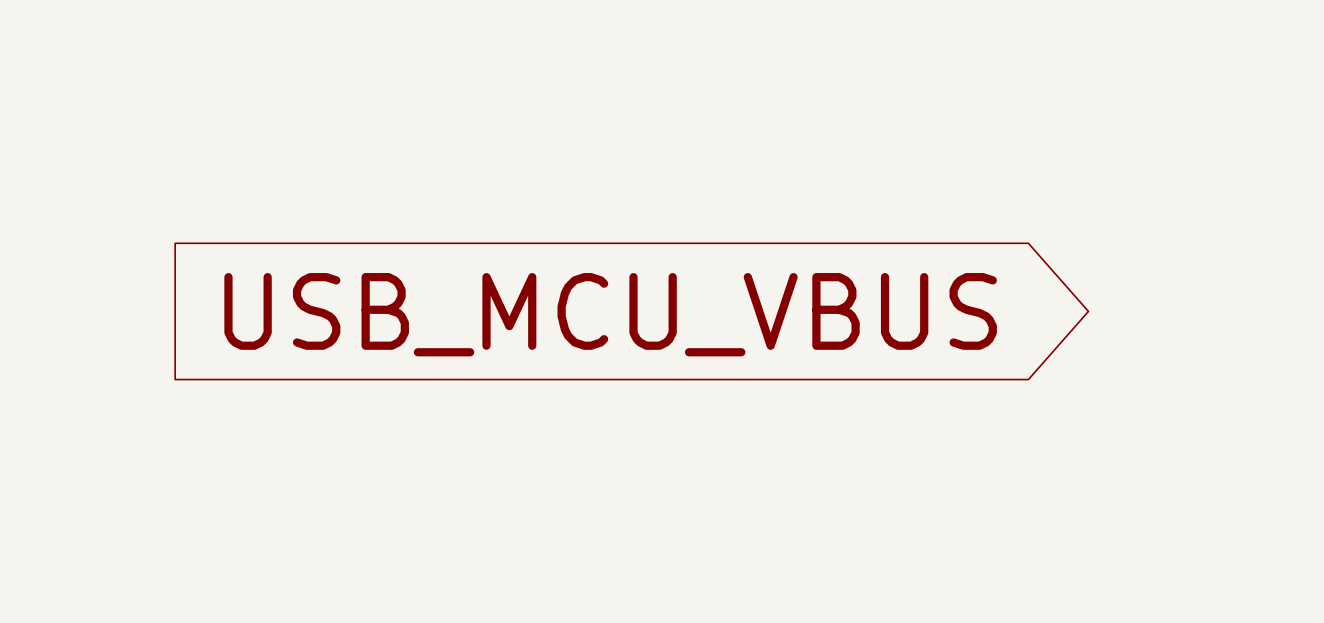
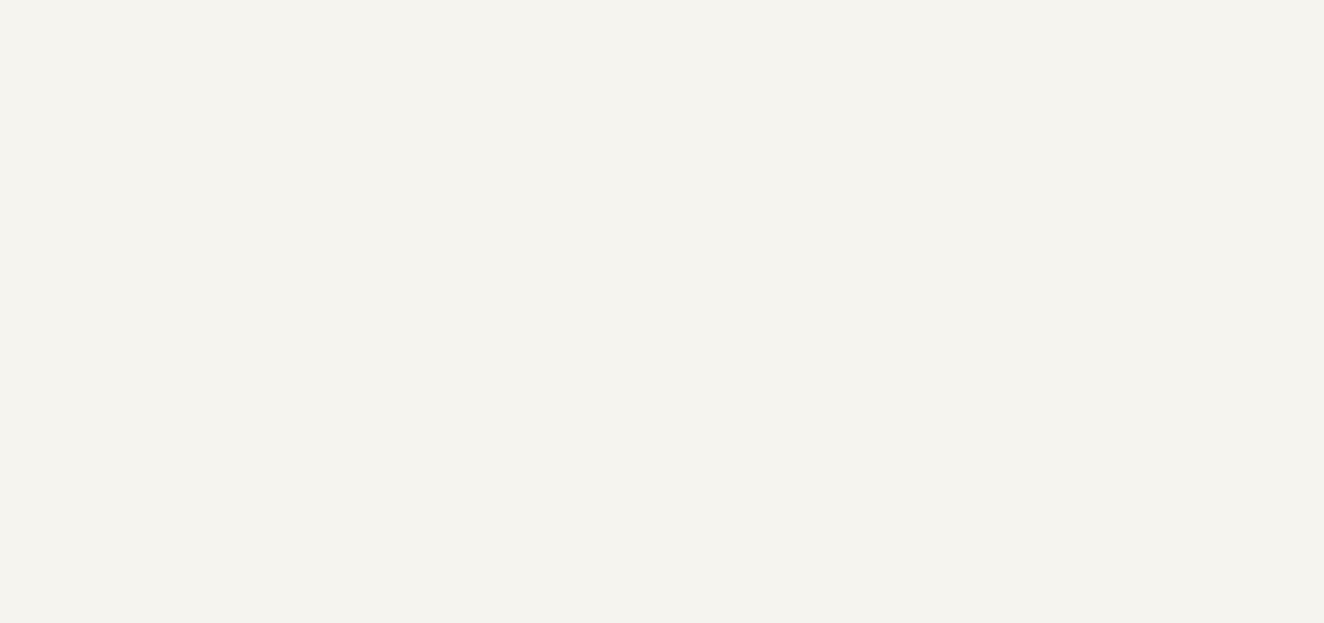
global label: USB_MCU_VBUS (610, 314) -> none

